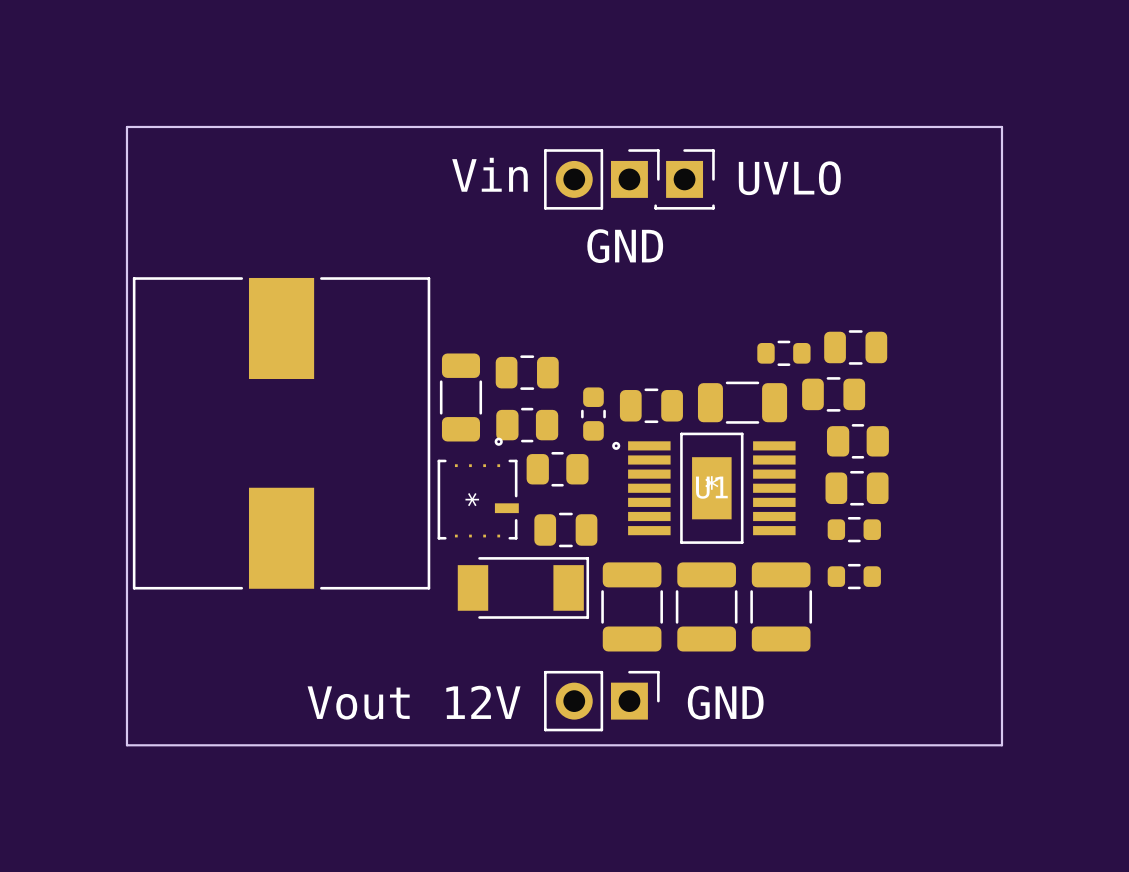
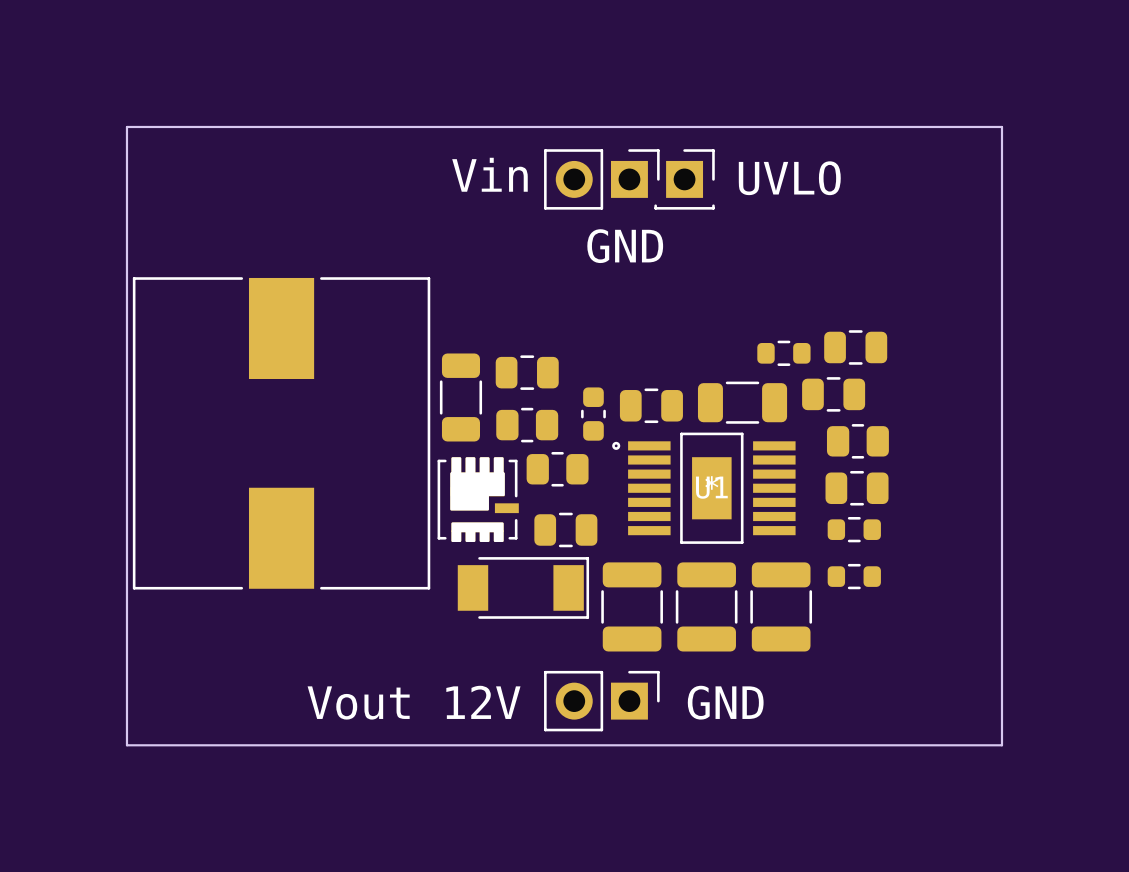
part footprint: [437, 437, 519, 540] -> [437, 457, 519, 542]

